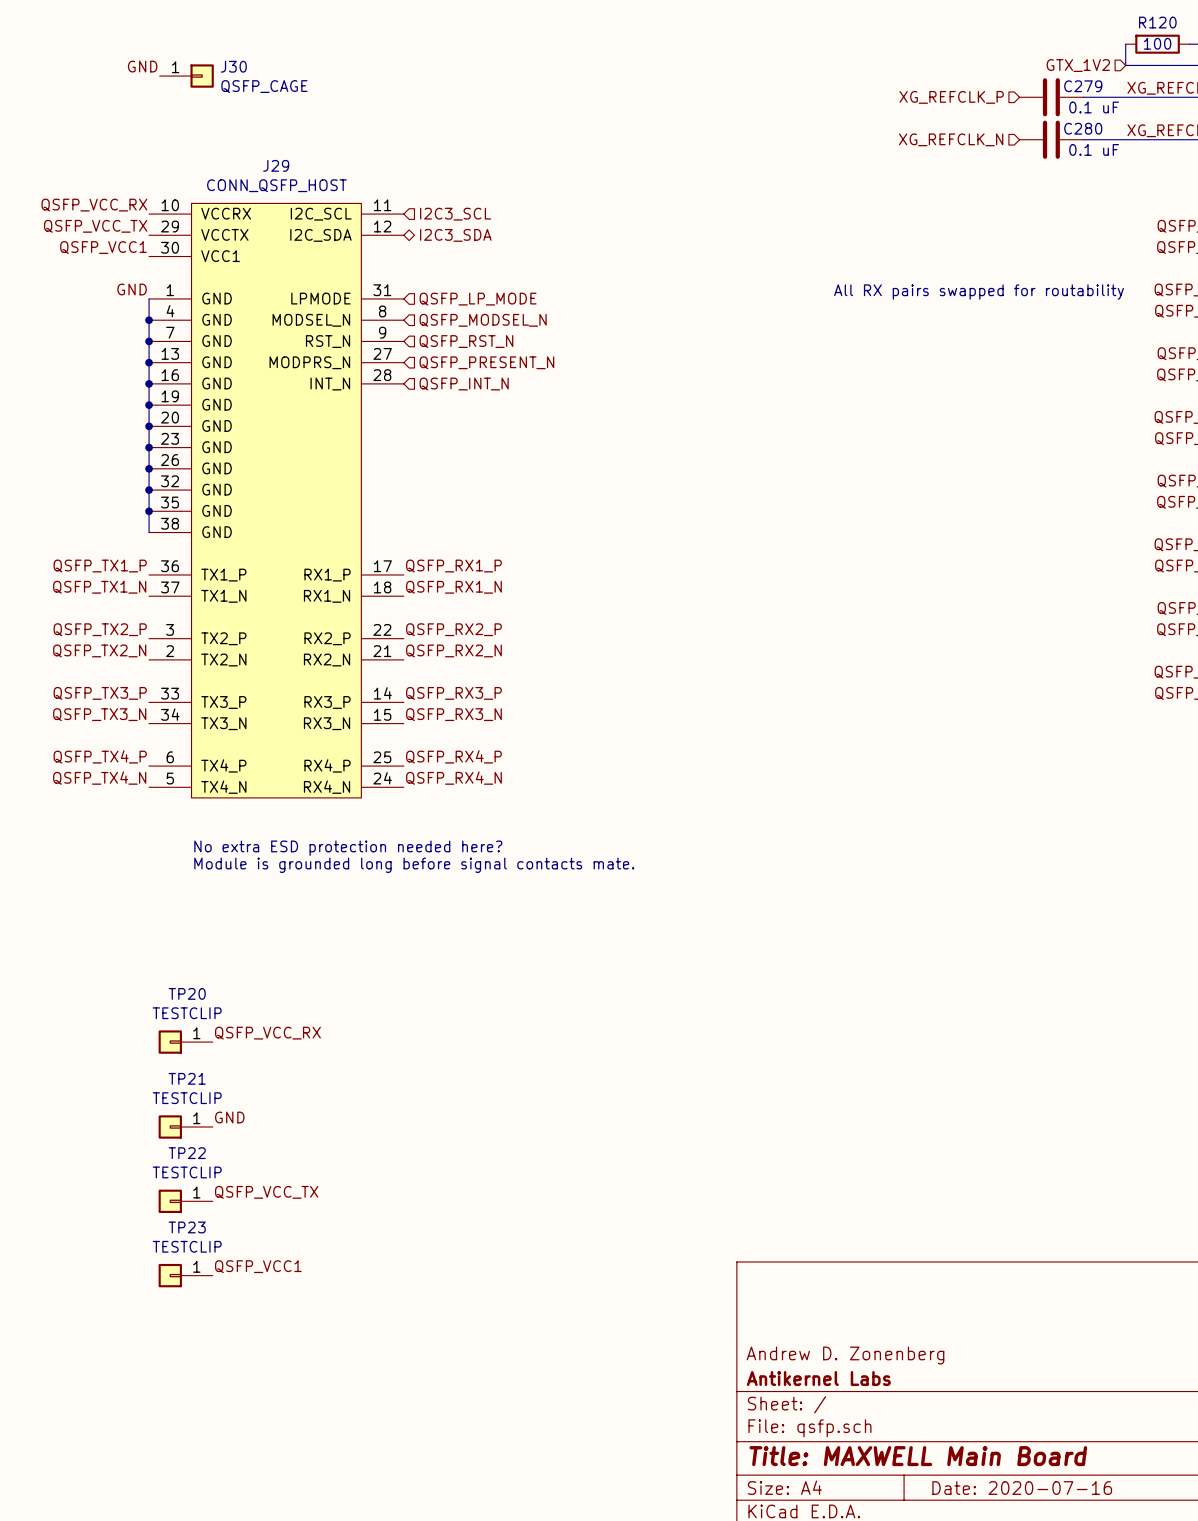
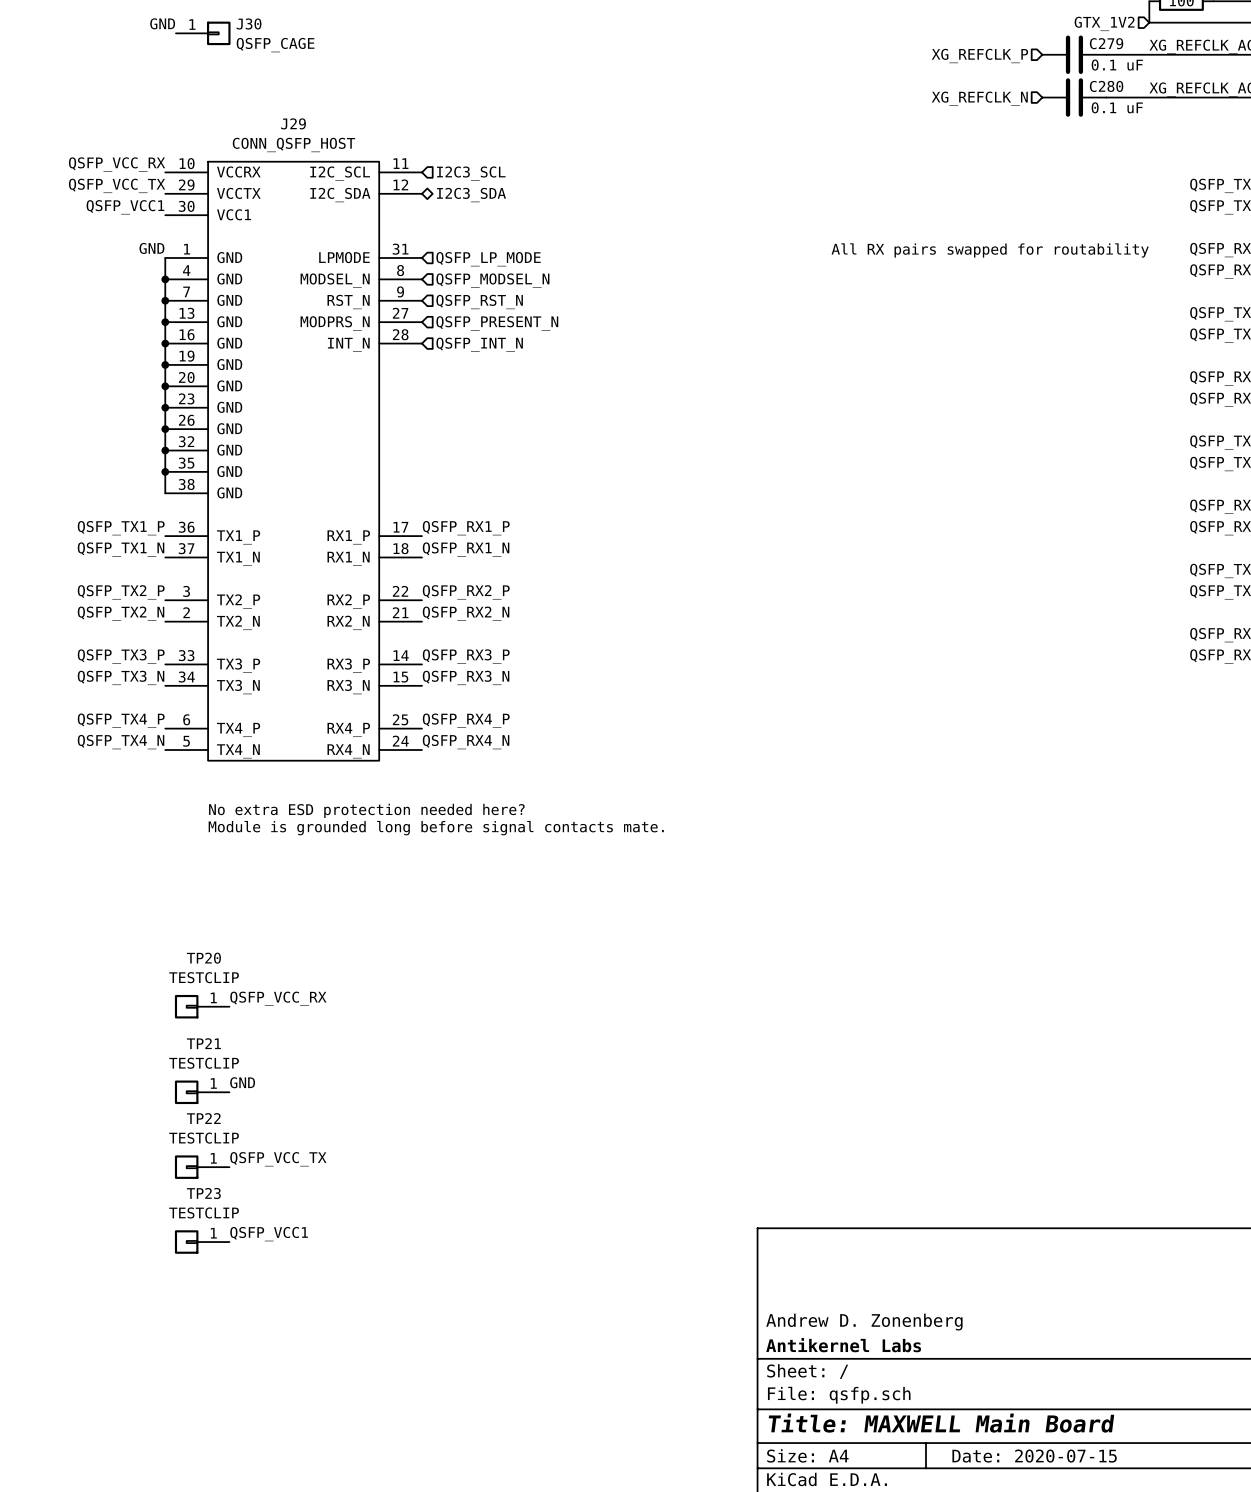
title block: Date: 2020-07-16 (1022, 1488) -> Date: 2020-07-15 (1034, 1456)

